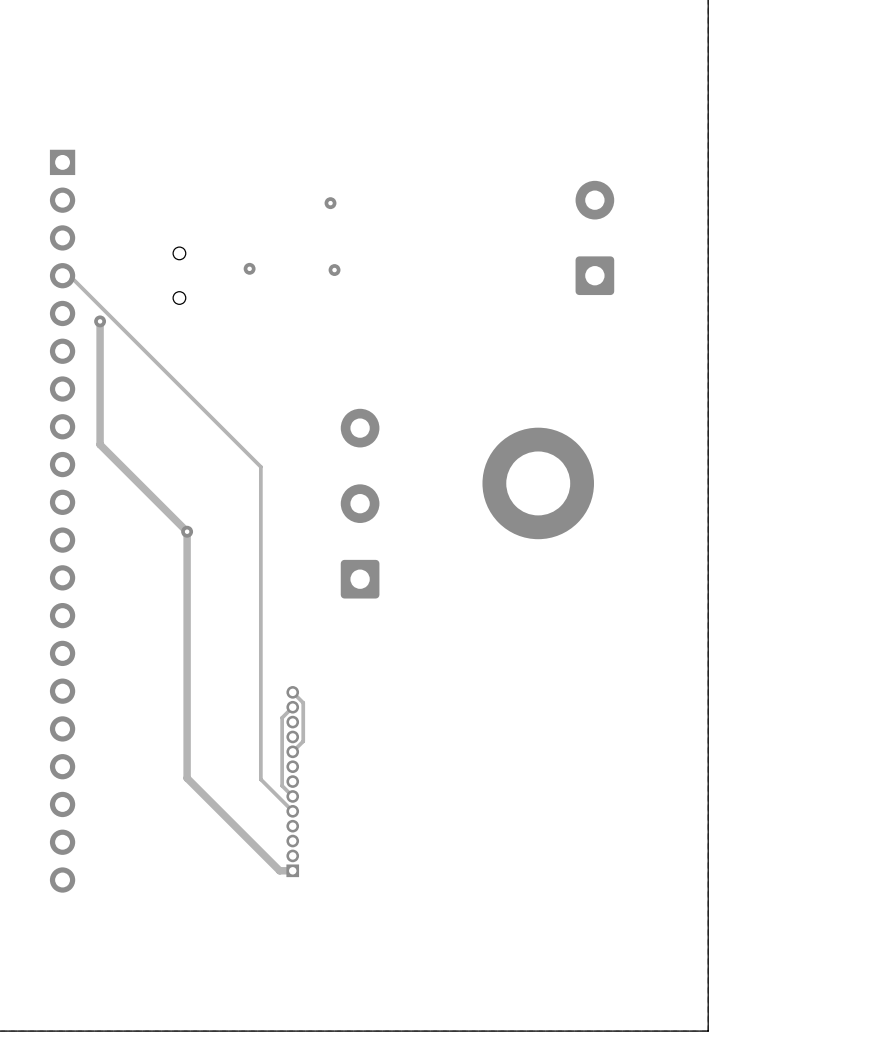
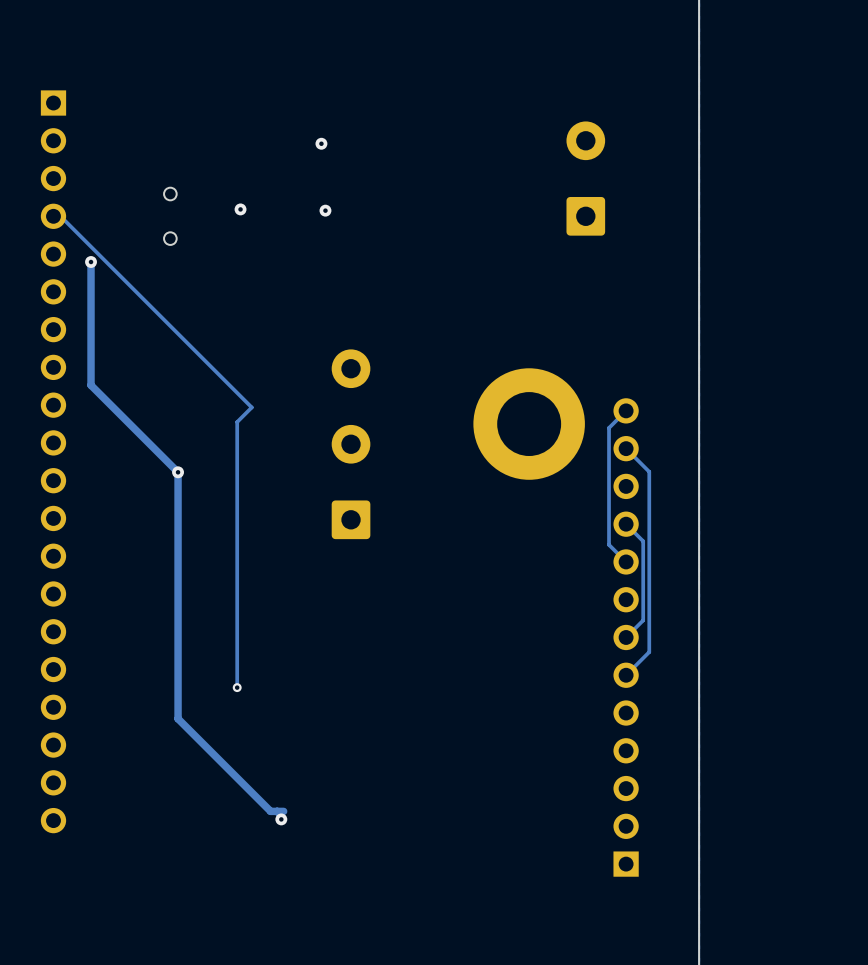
track: (260, 466) (260, 779) (292, 811) -> (251, 407) (237, 422) (237, 687)
track: none -> (626, 410) (609, 427) (609, 544) (626, 561)
track: none -> (626, 448) (649, 471) (649, 652) (626, 675)
track: none -> (626, 524) (643, 541) (643, 620) (626, 637)
track: (292, 692) (303, 702) (303, 741) (292, 751) -> none
part: none -> (626, 637)
track: (292, 707) (282, 717) (282, 785) (292, 796) -> none
via: none -> (237, 687)
part: (292, 781) -> none
via: none -> (281, 819)

